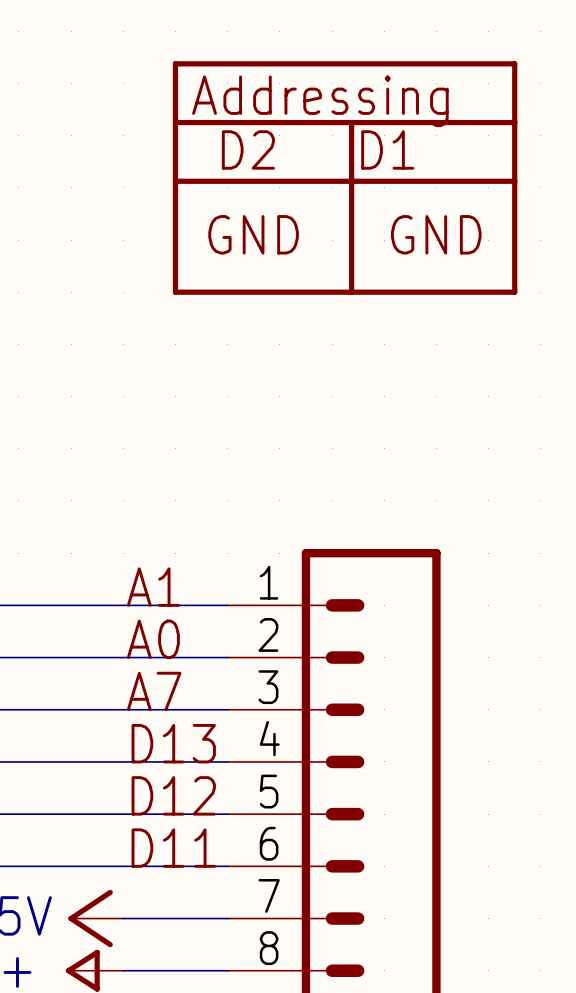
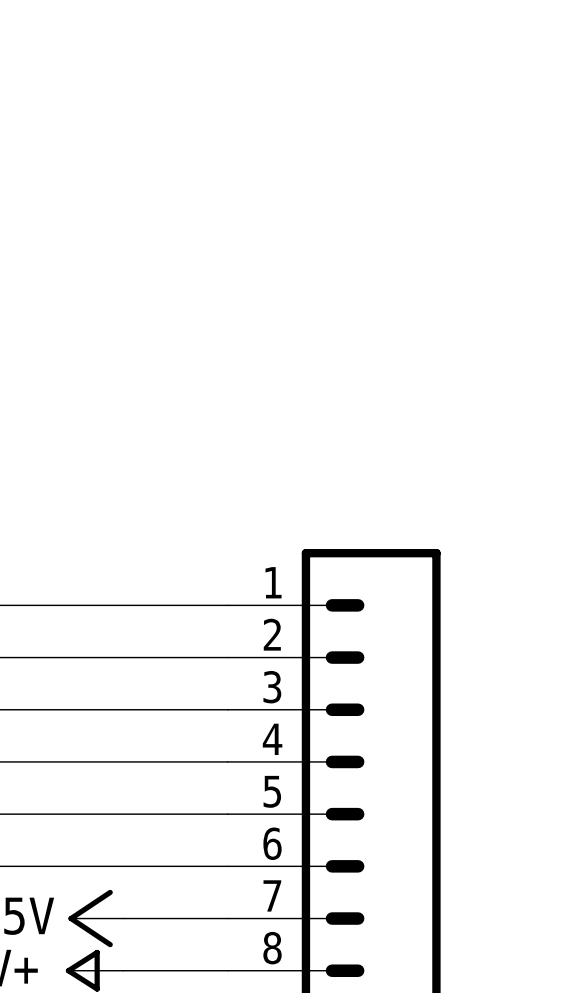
GND: GND (345, 178) -> none
label: A1 (153, 587) -> none
label: A0 (153, 639) -> none
label: A7 (154, 691) -> none
label: D13 (173, 743) -> none
label: D12 (173, 795) -> none
label: D11 (173, 848) -> none

